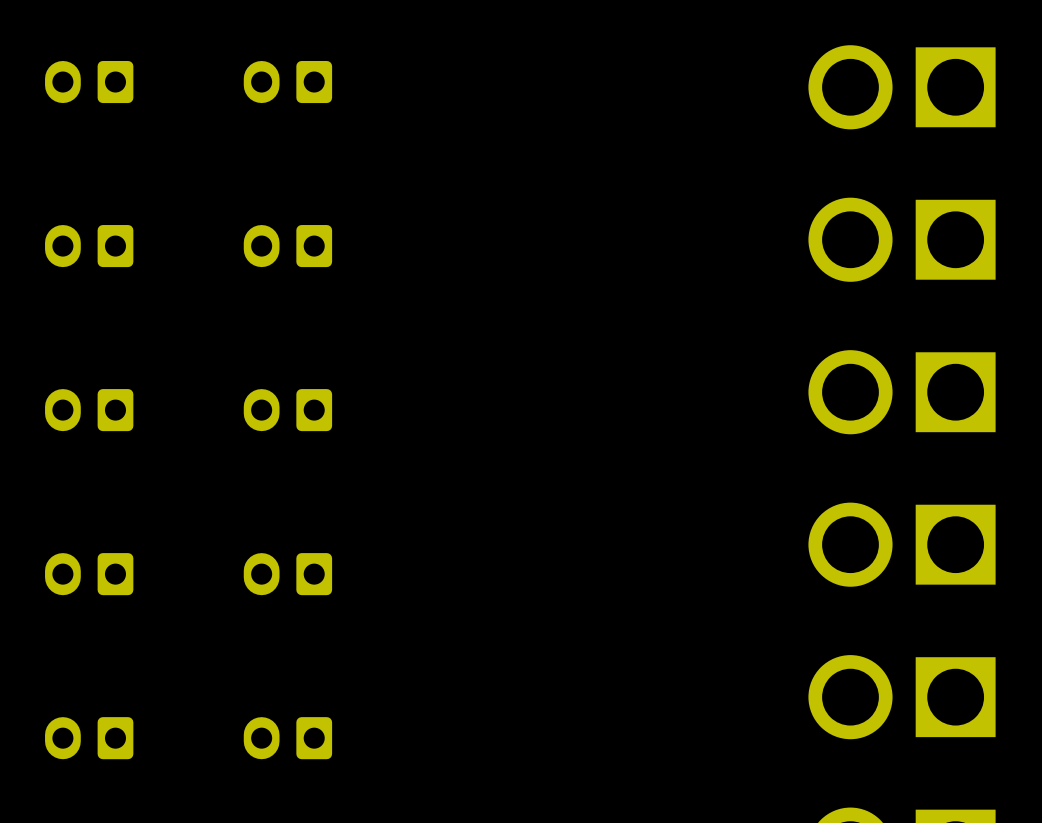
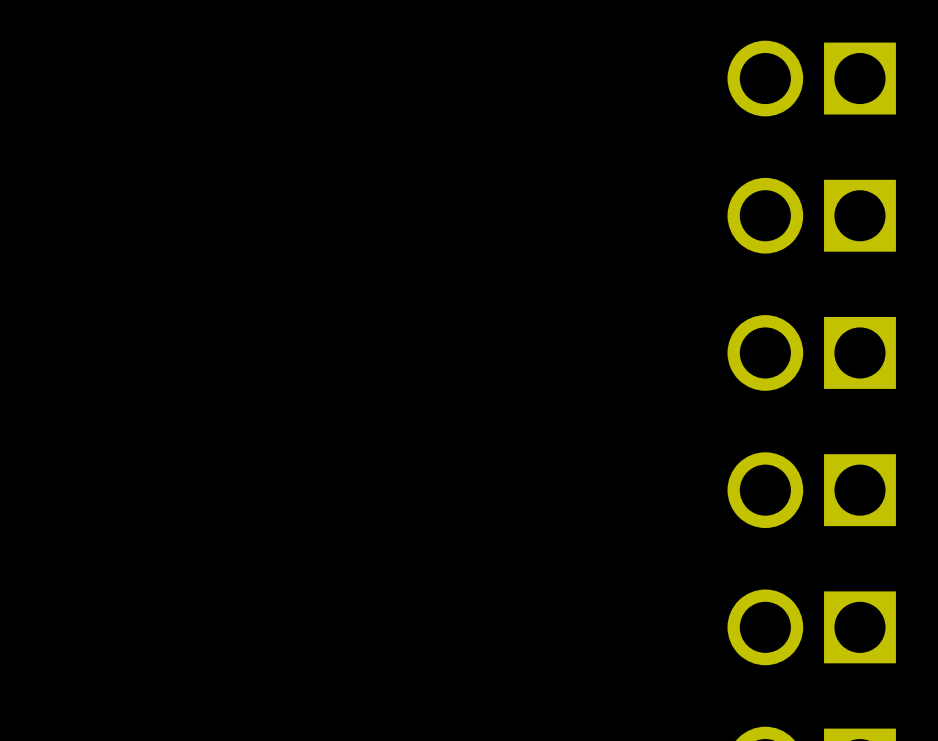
part: (89, 82) -> none
part: (287, 82) -> none
part: (89, 246) -> none
part: (287, 246) -> none
part: (89, 410) -> none
part: (287, 410) -> none
part: (89, 574) -> none
part: (287, 574) -> none
part: (89, 738) -> none
part: (287, 738) -> none

